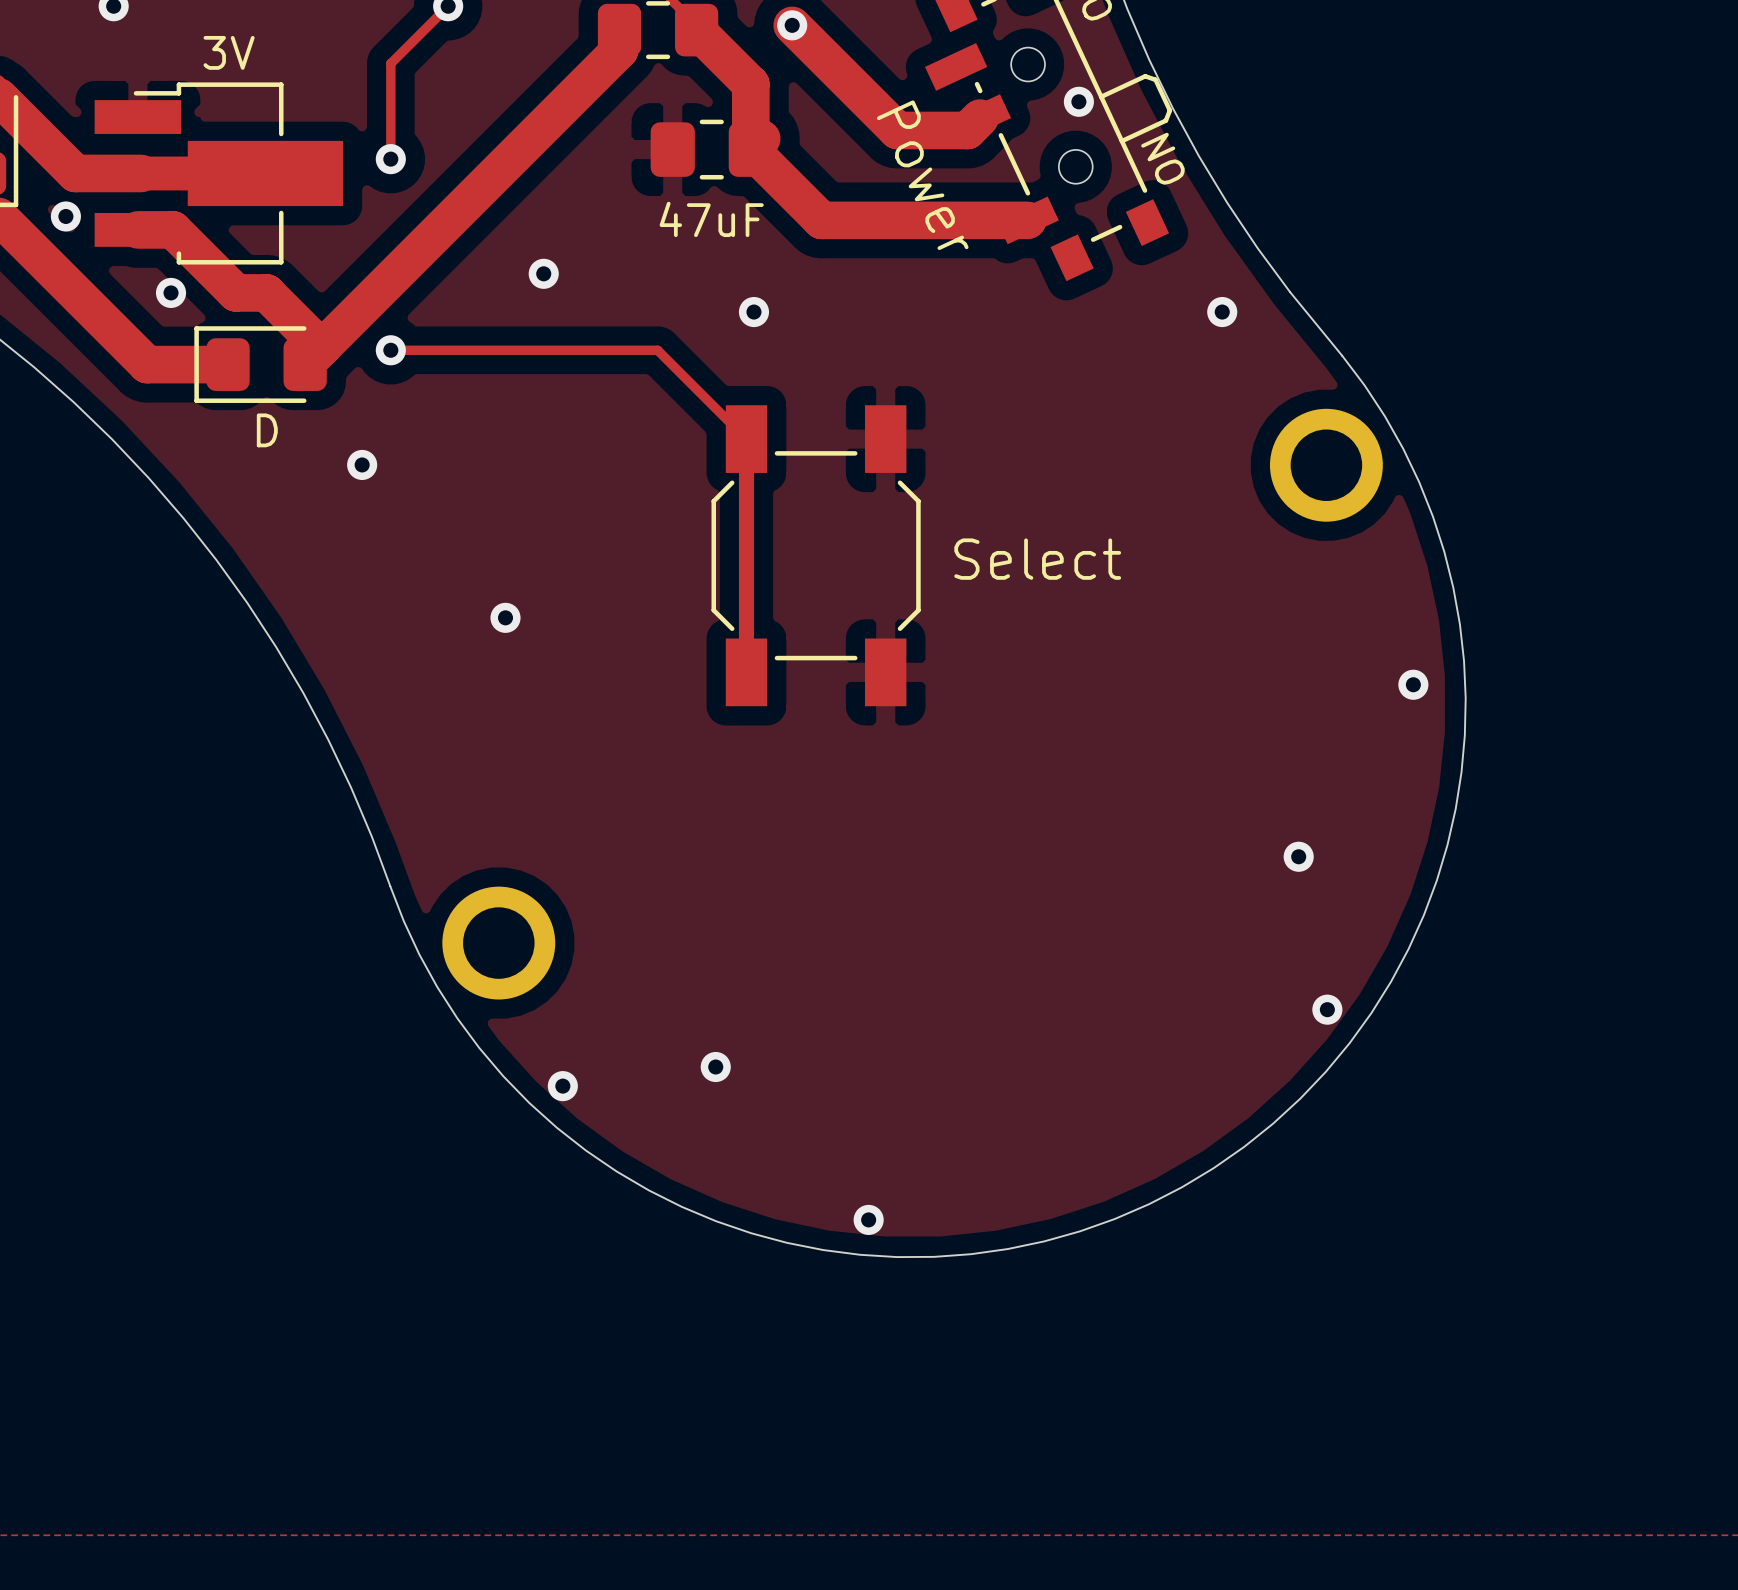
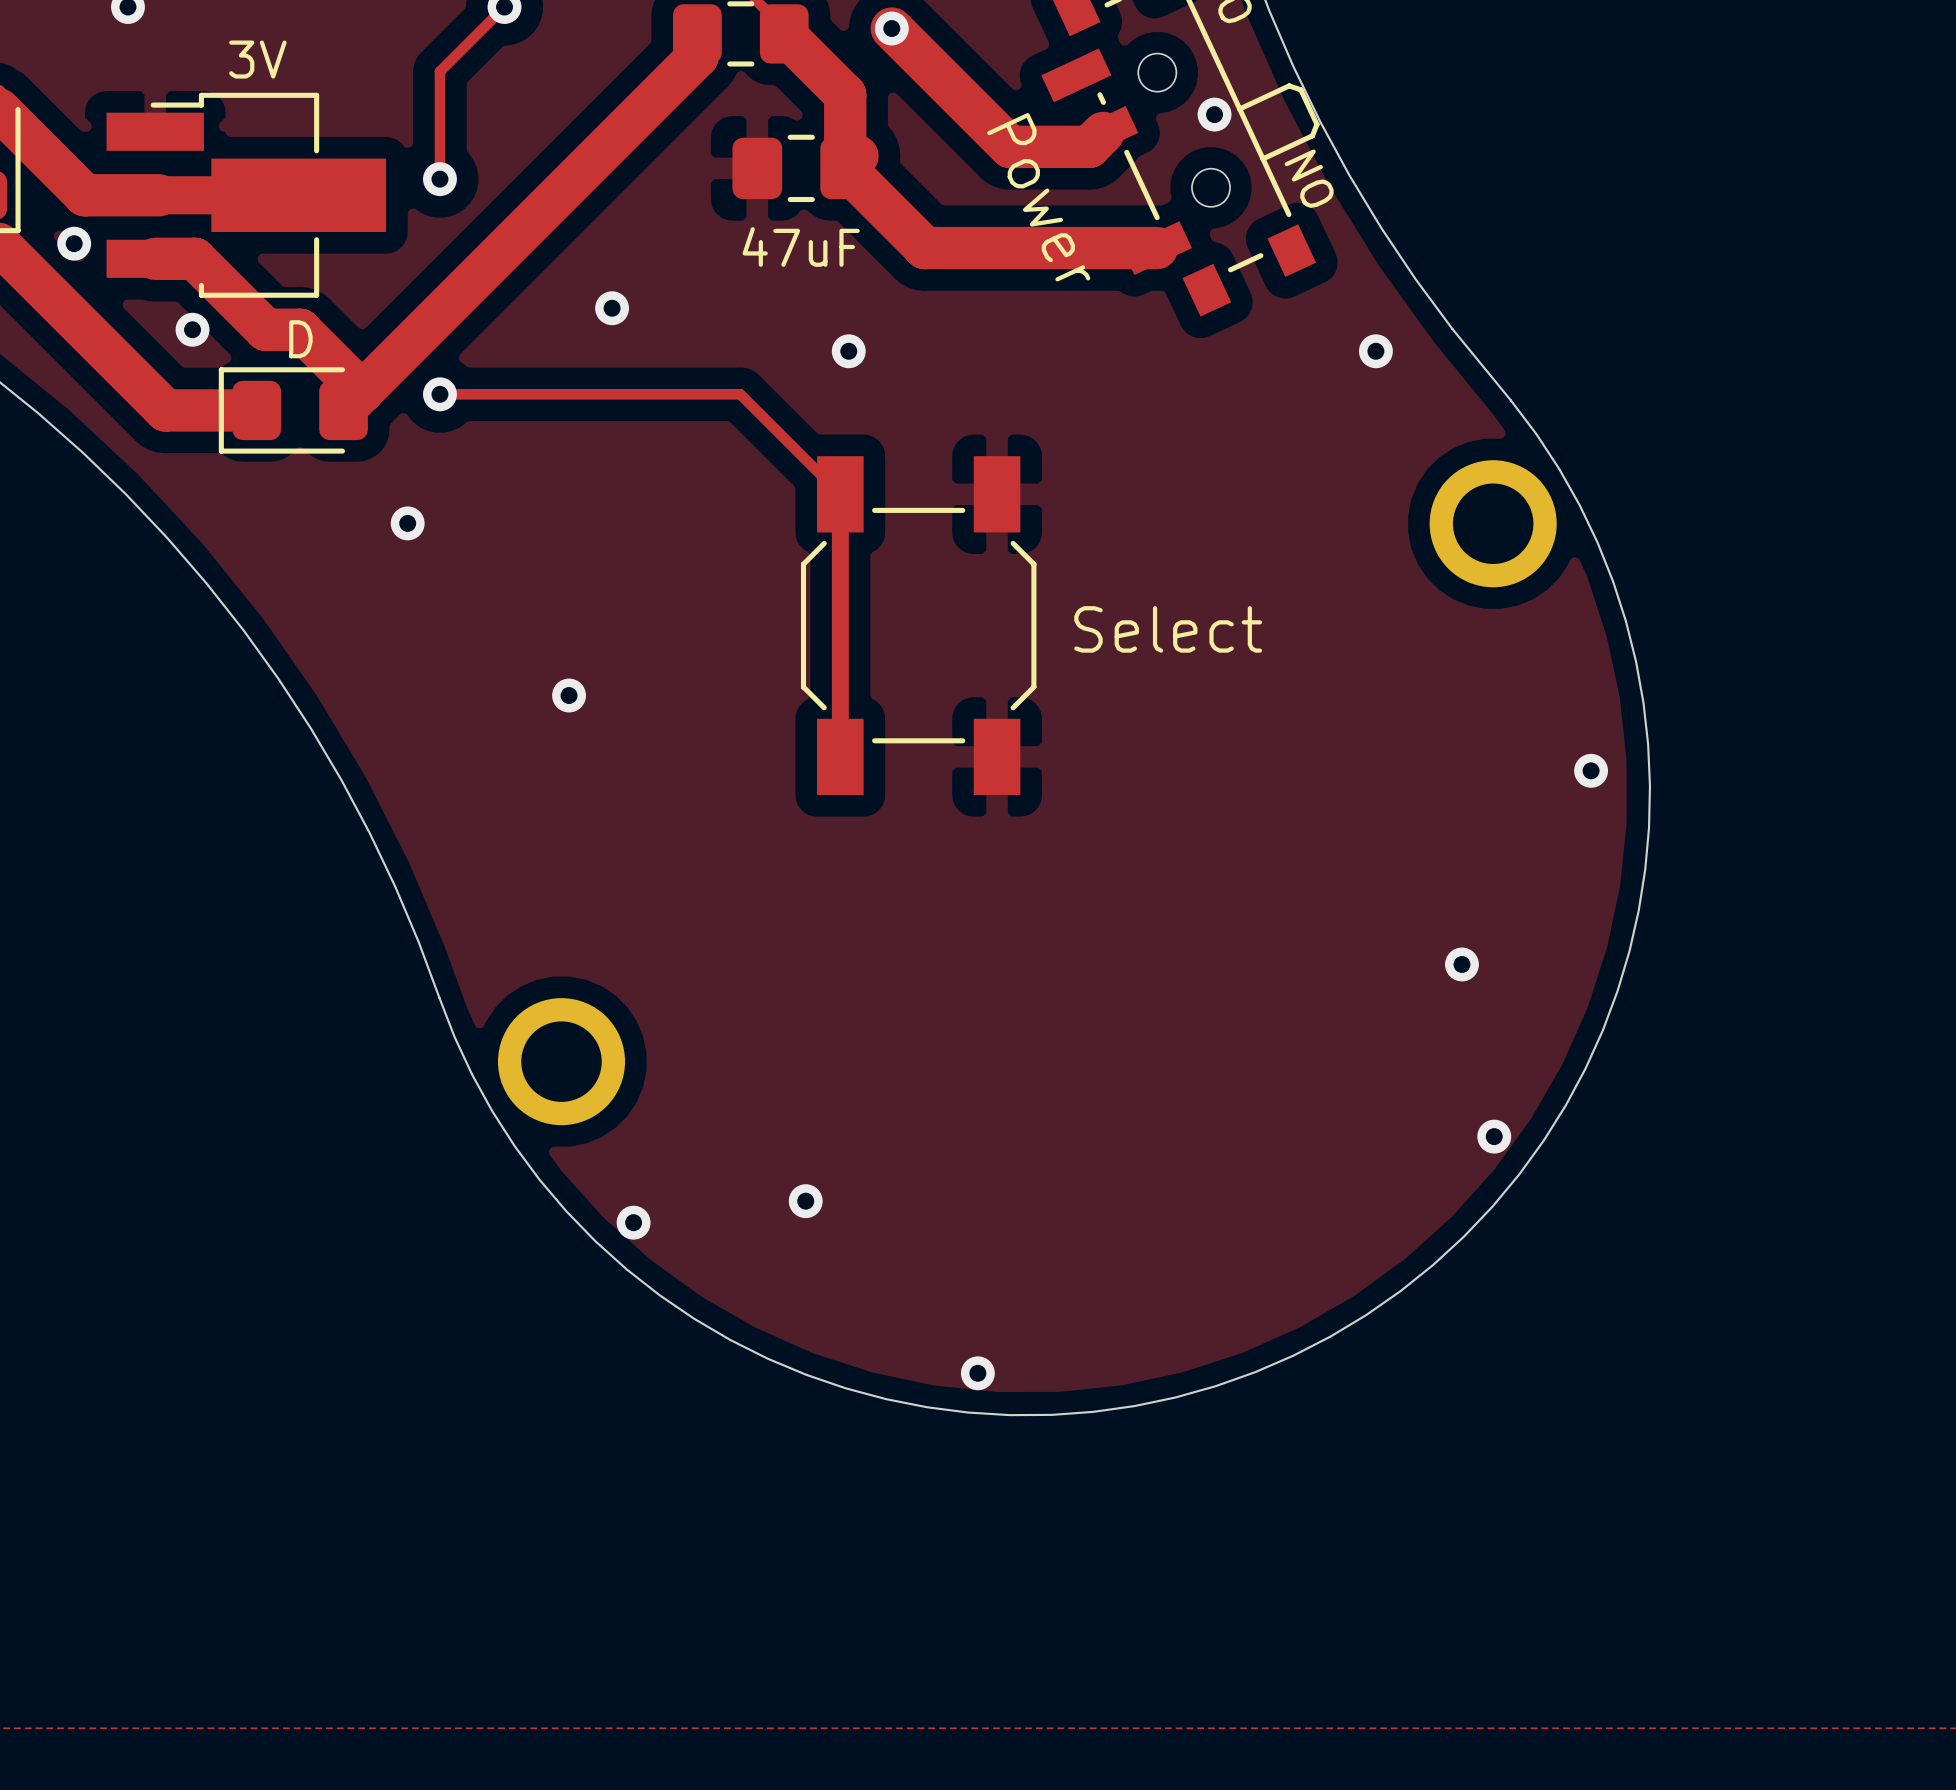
text position: D (267, 430) -> D (300, 339)

